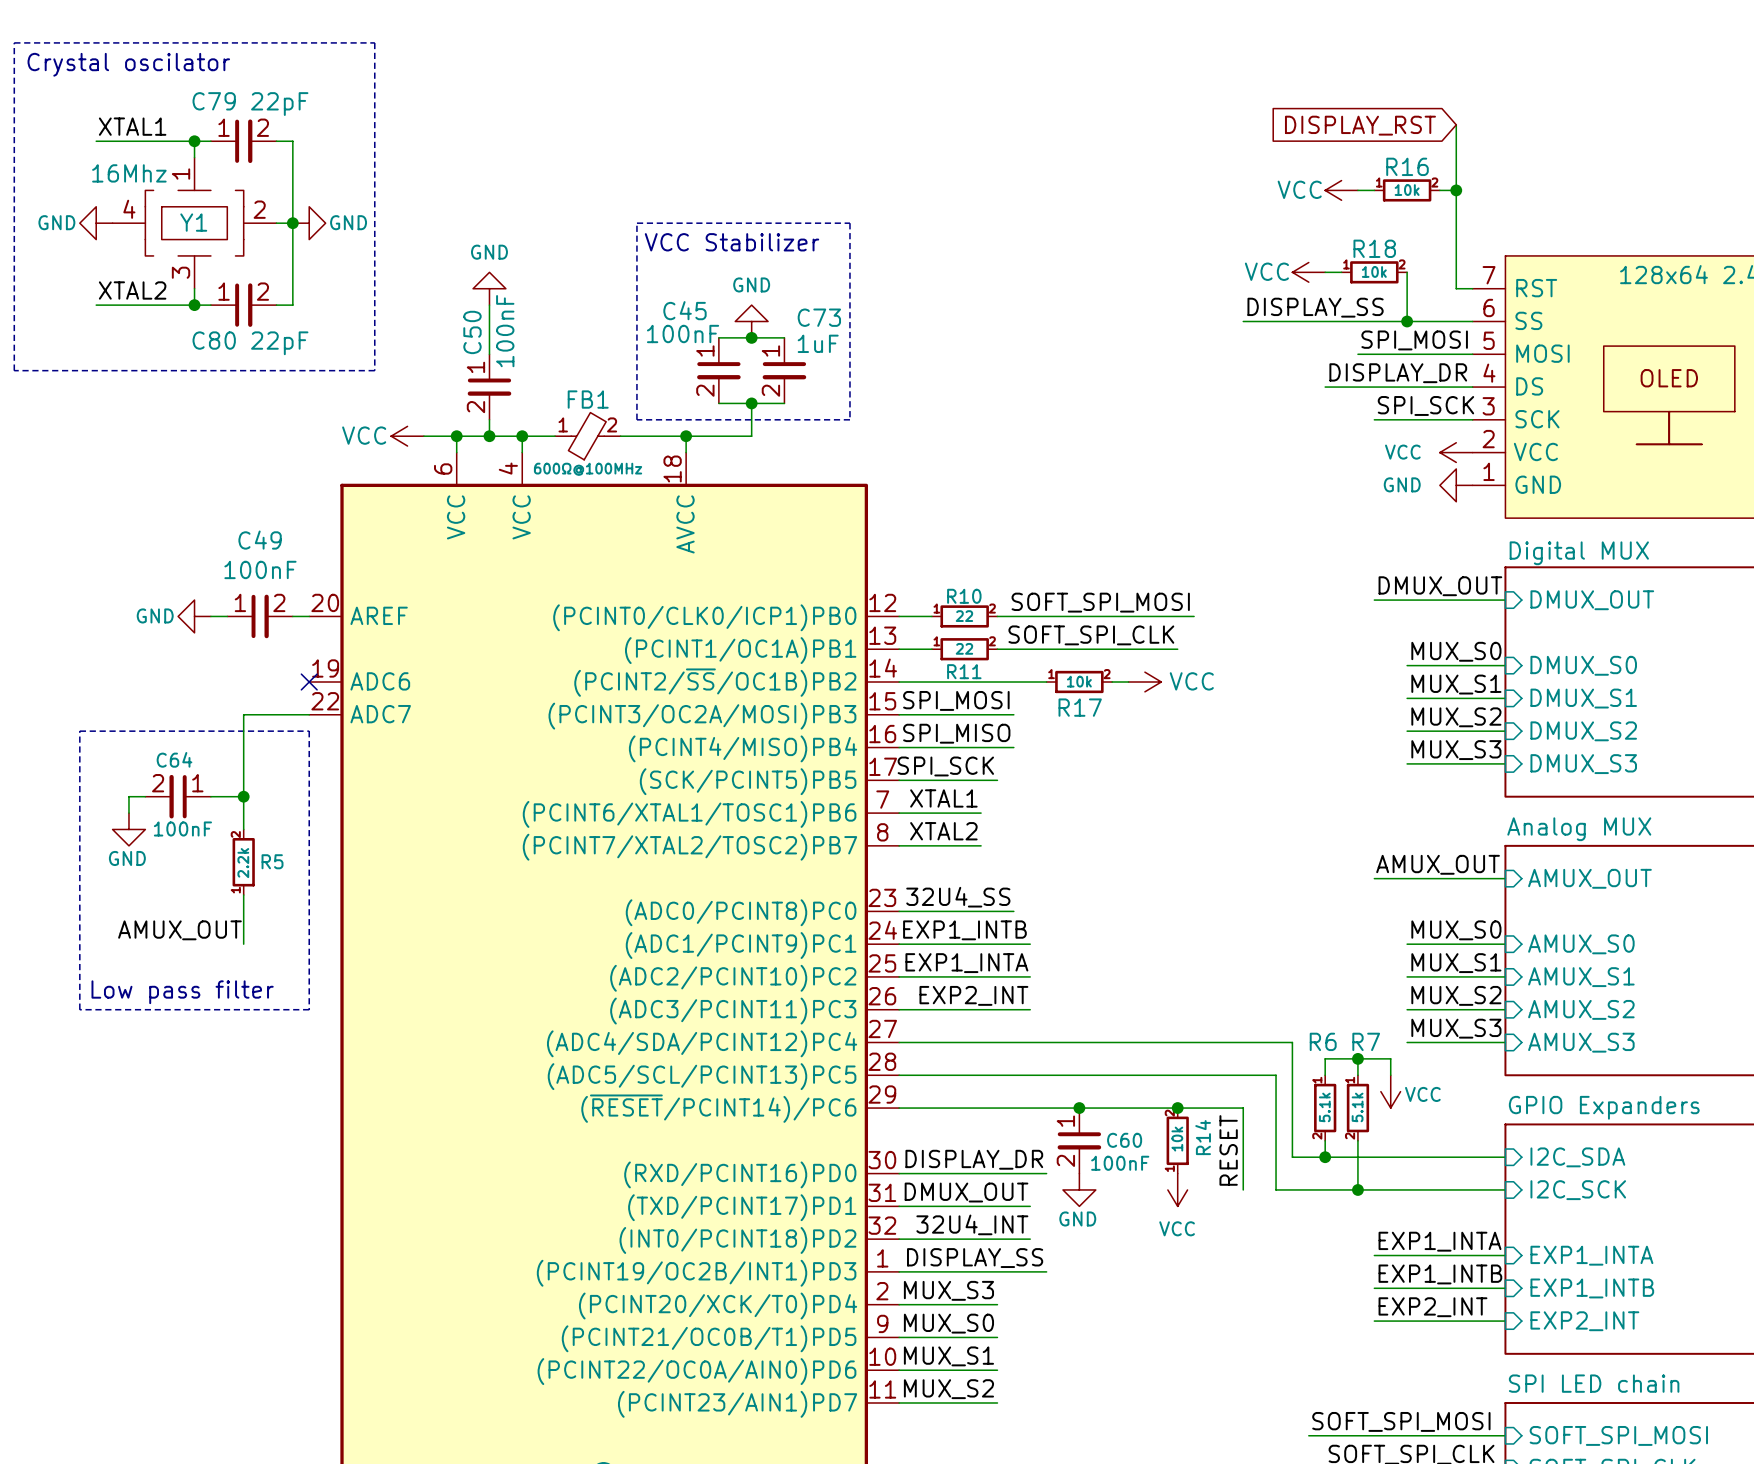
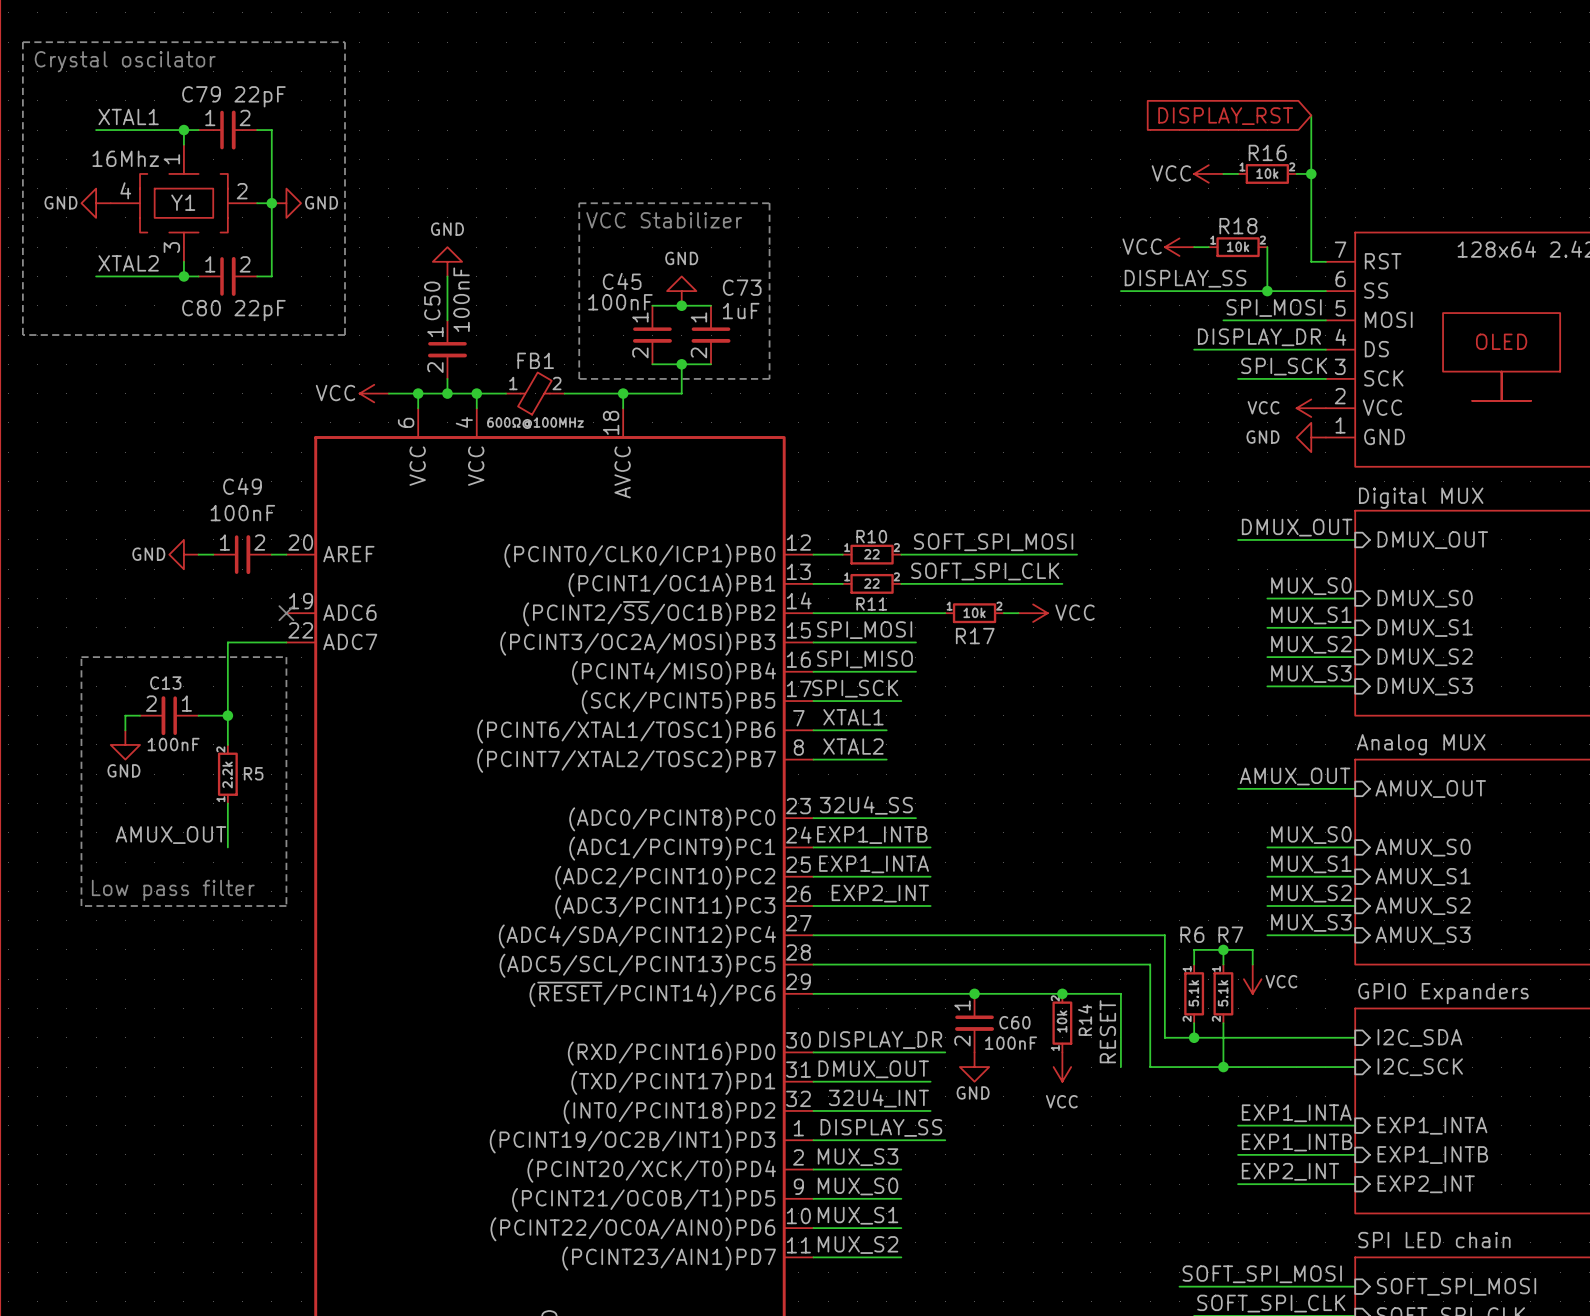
C64 name: C64 (174, 759) -> C13 (165, 683)

